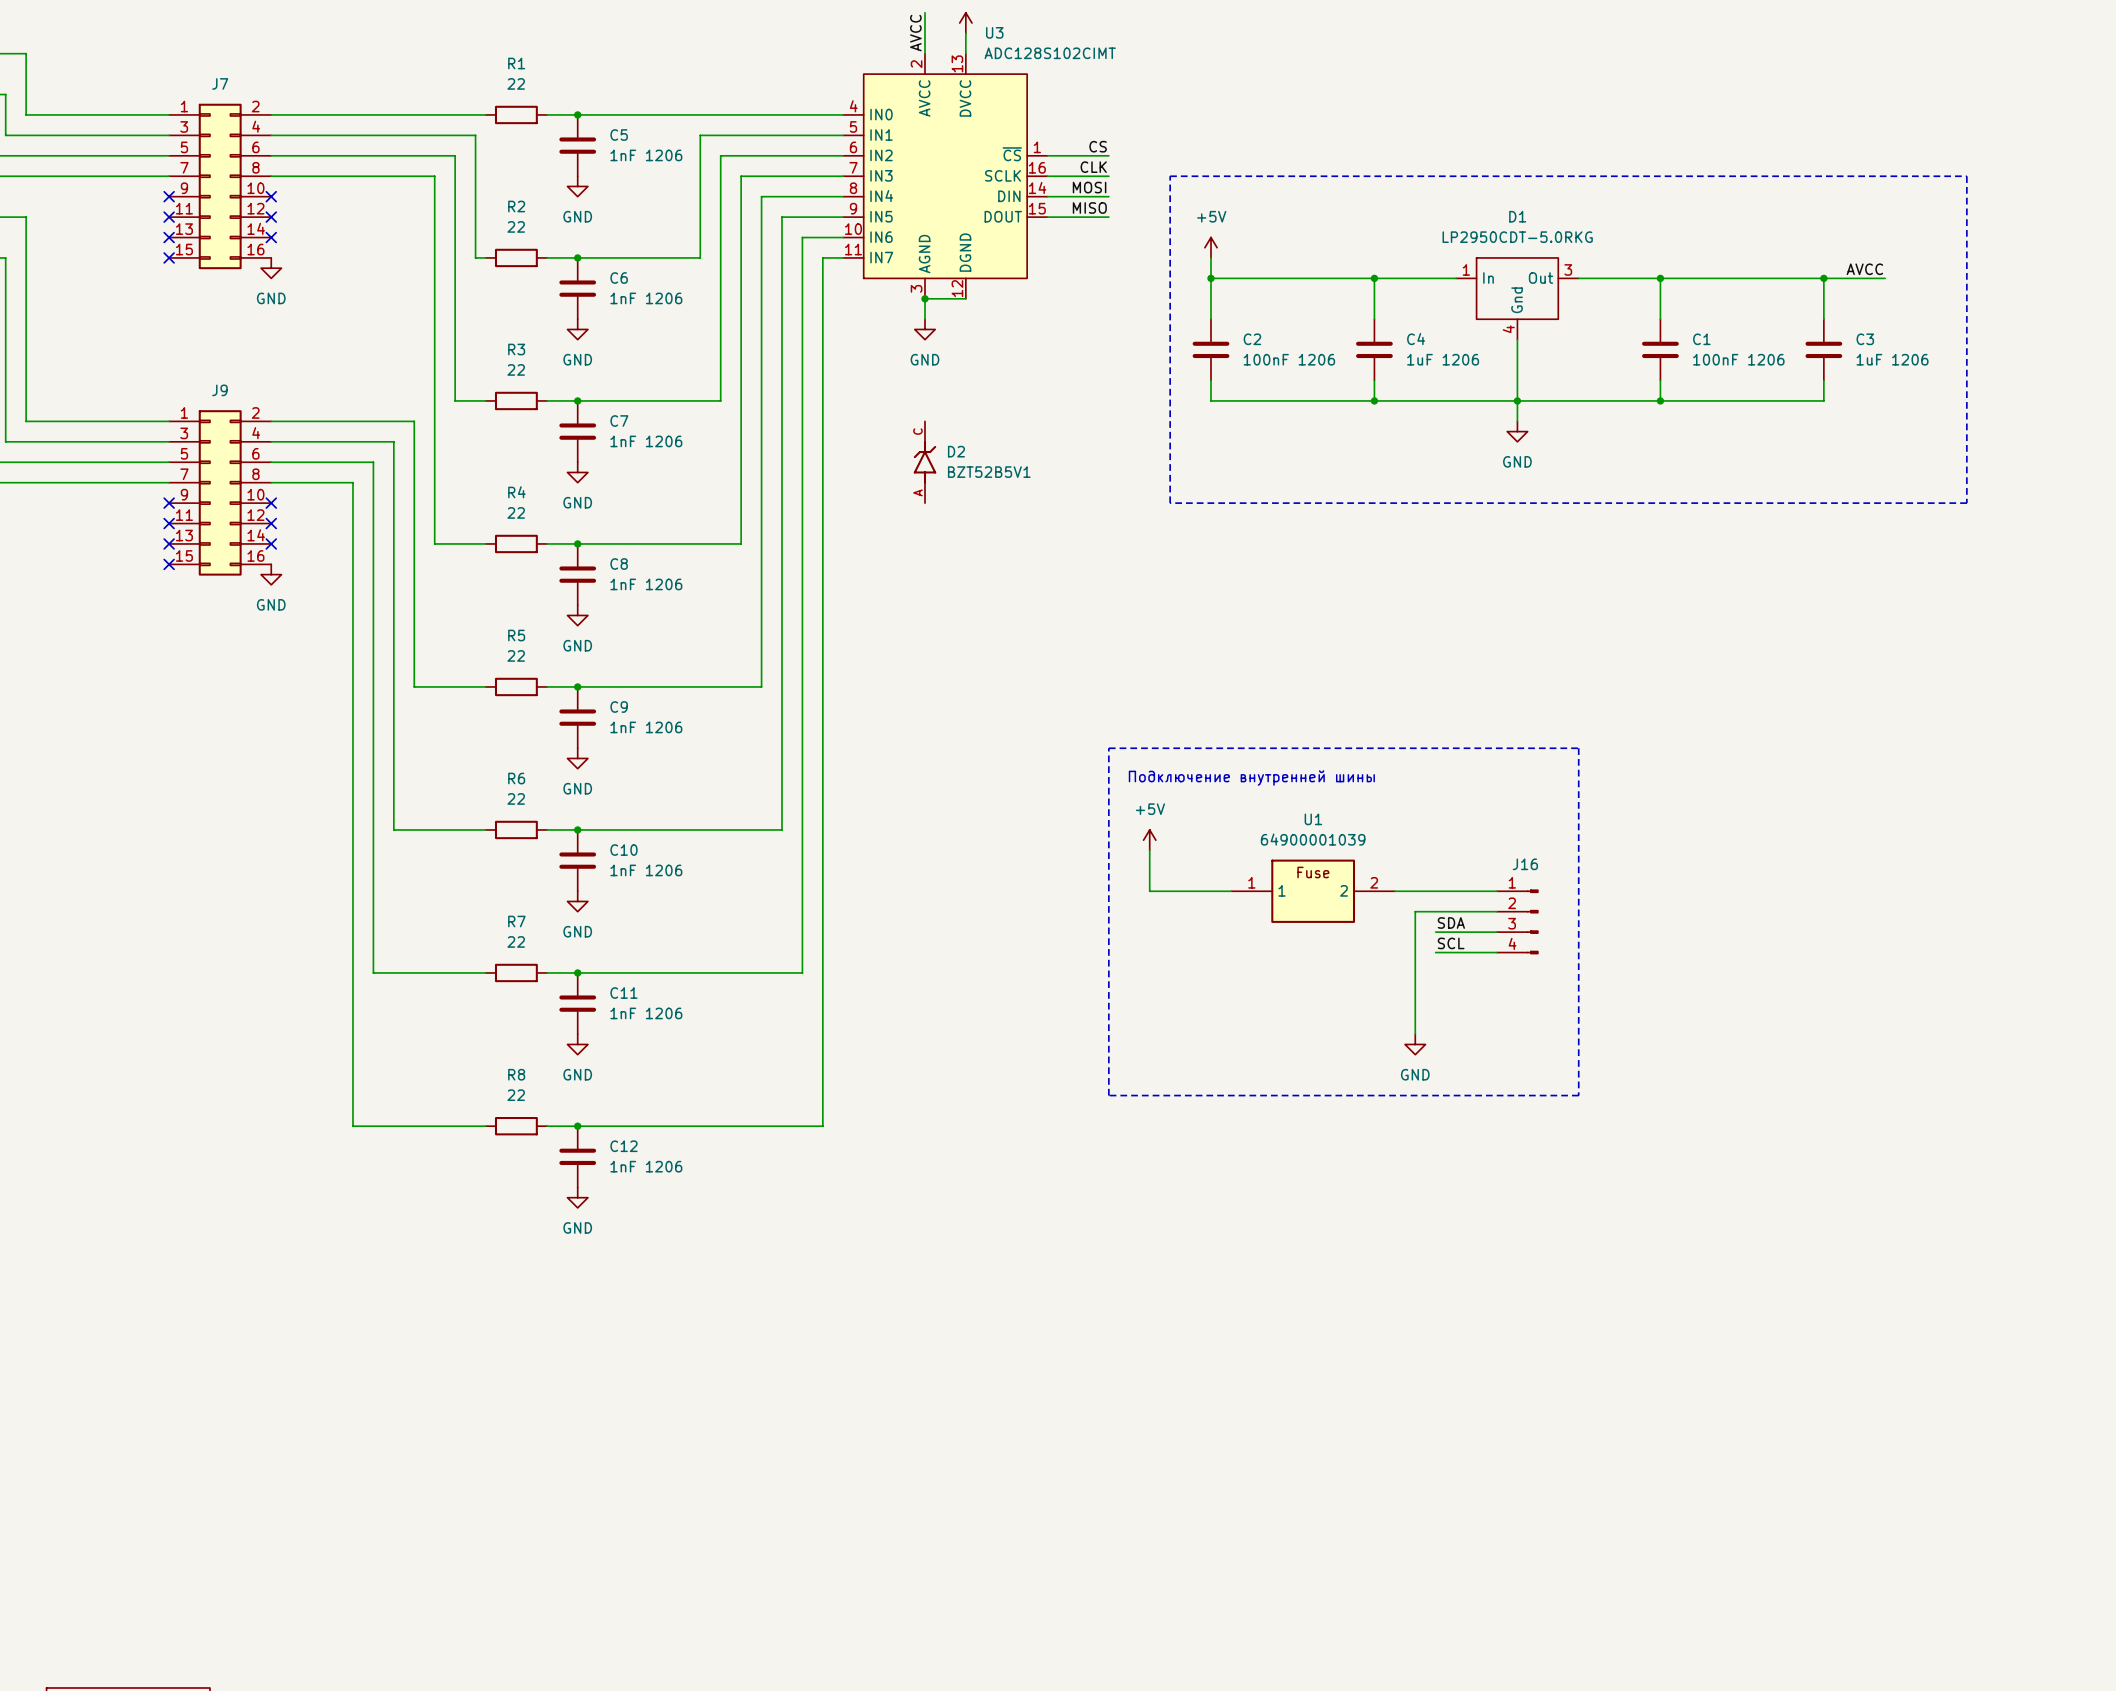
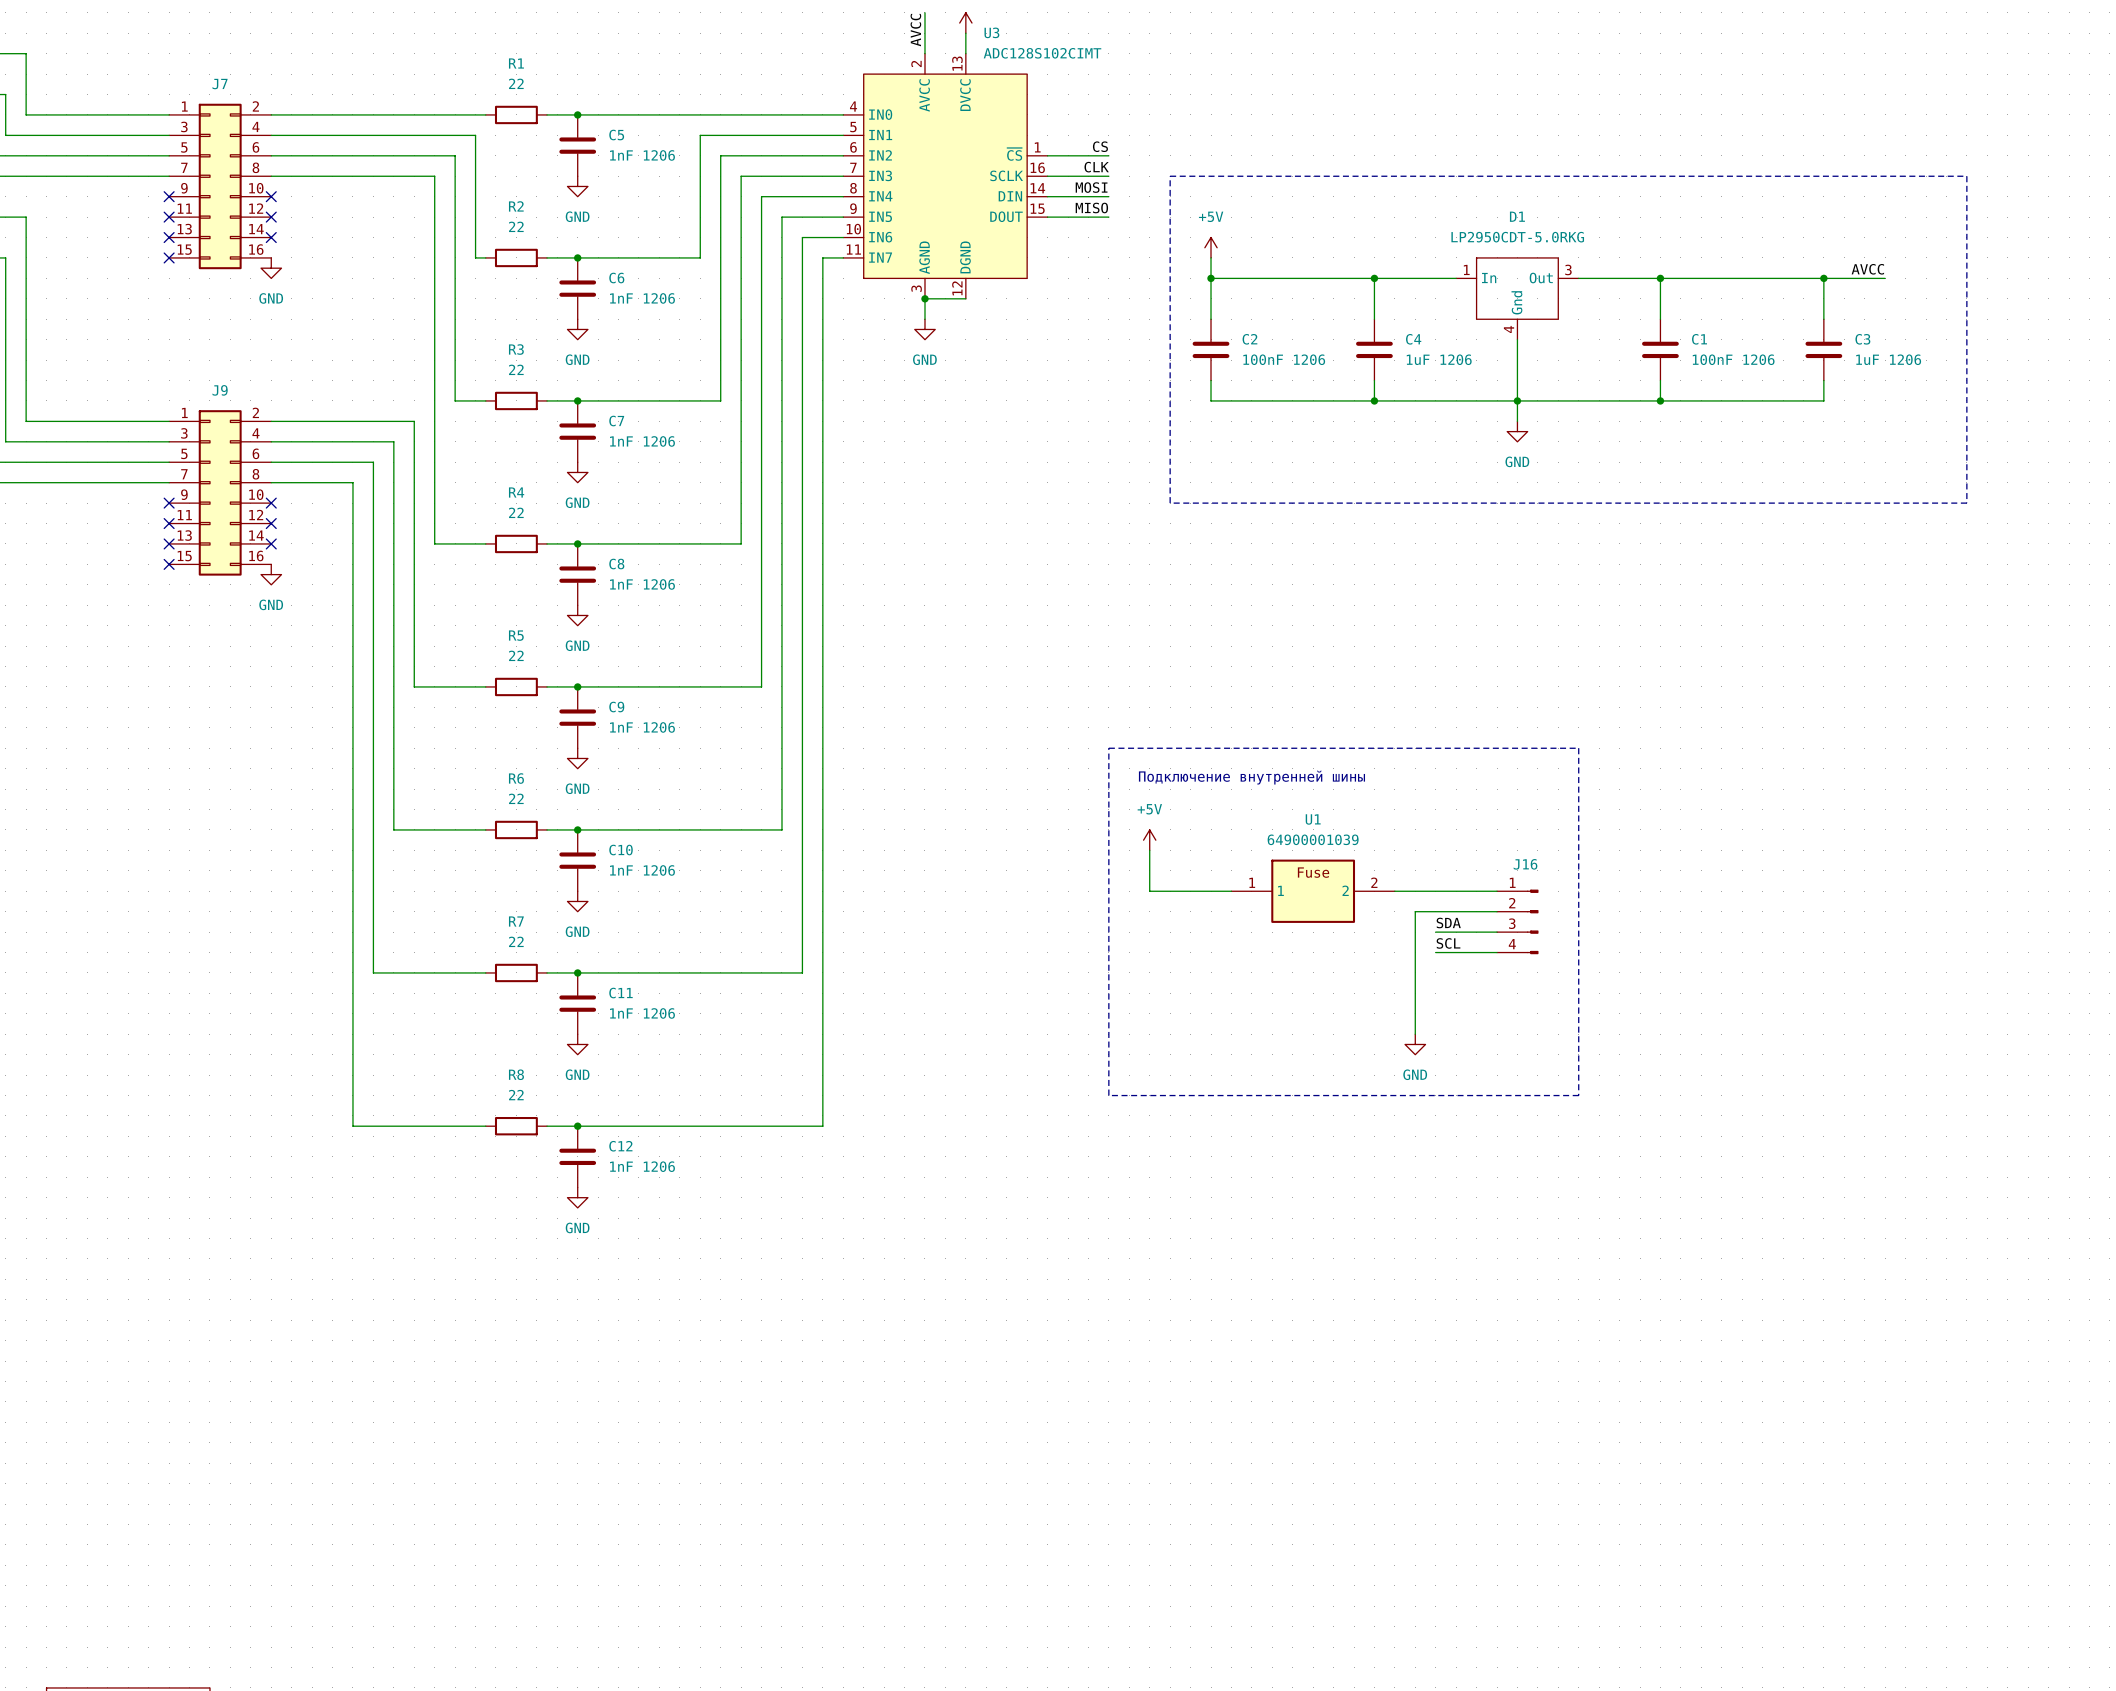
D2: BZT52B5V1 (924, 462) -> none

